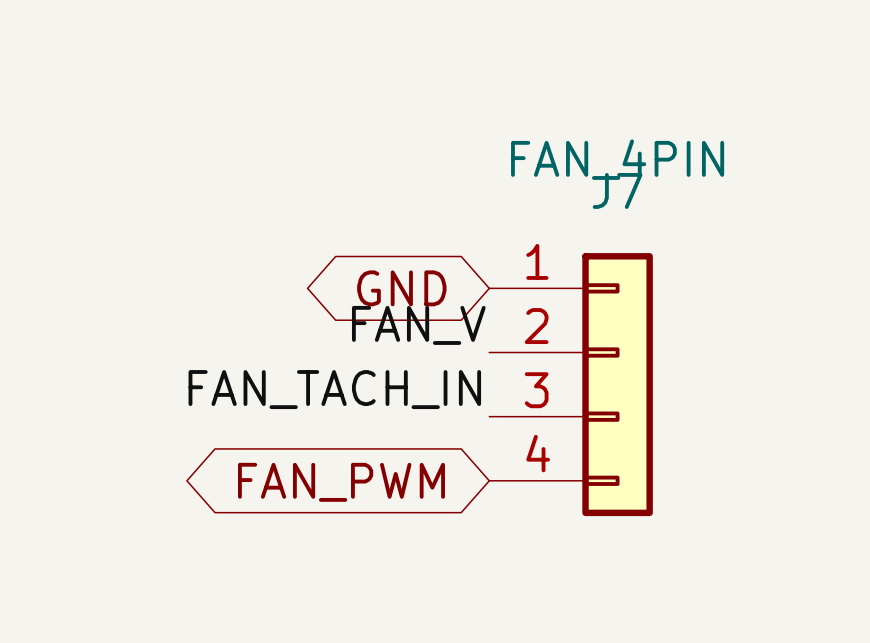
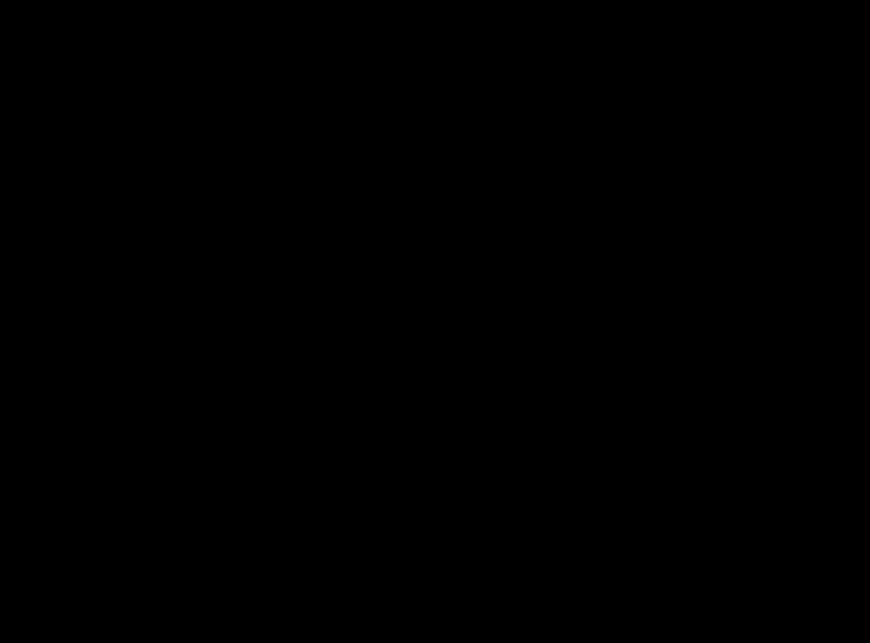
global label: GND (401, 288) -> none
label: FAN_V (418, 325) -> none
J7: FAN_4PIN (571, 384) -> none
label: FAN_TACH_IN (334, 389) -> none
global label: FAN_PWM (341, 482) -> none

